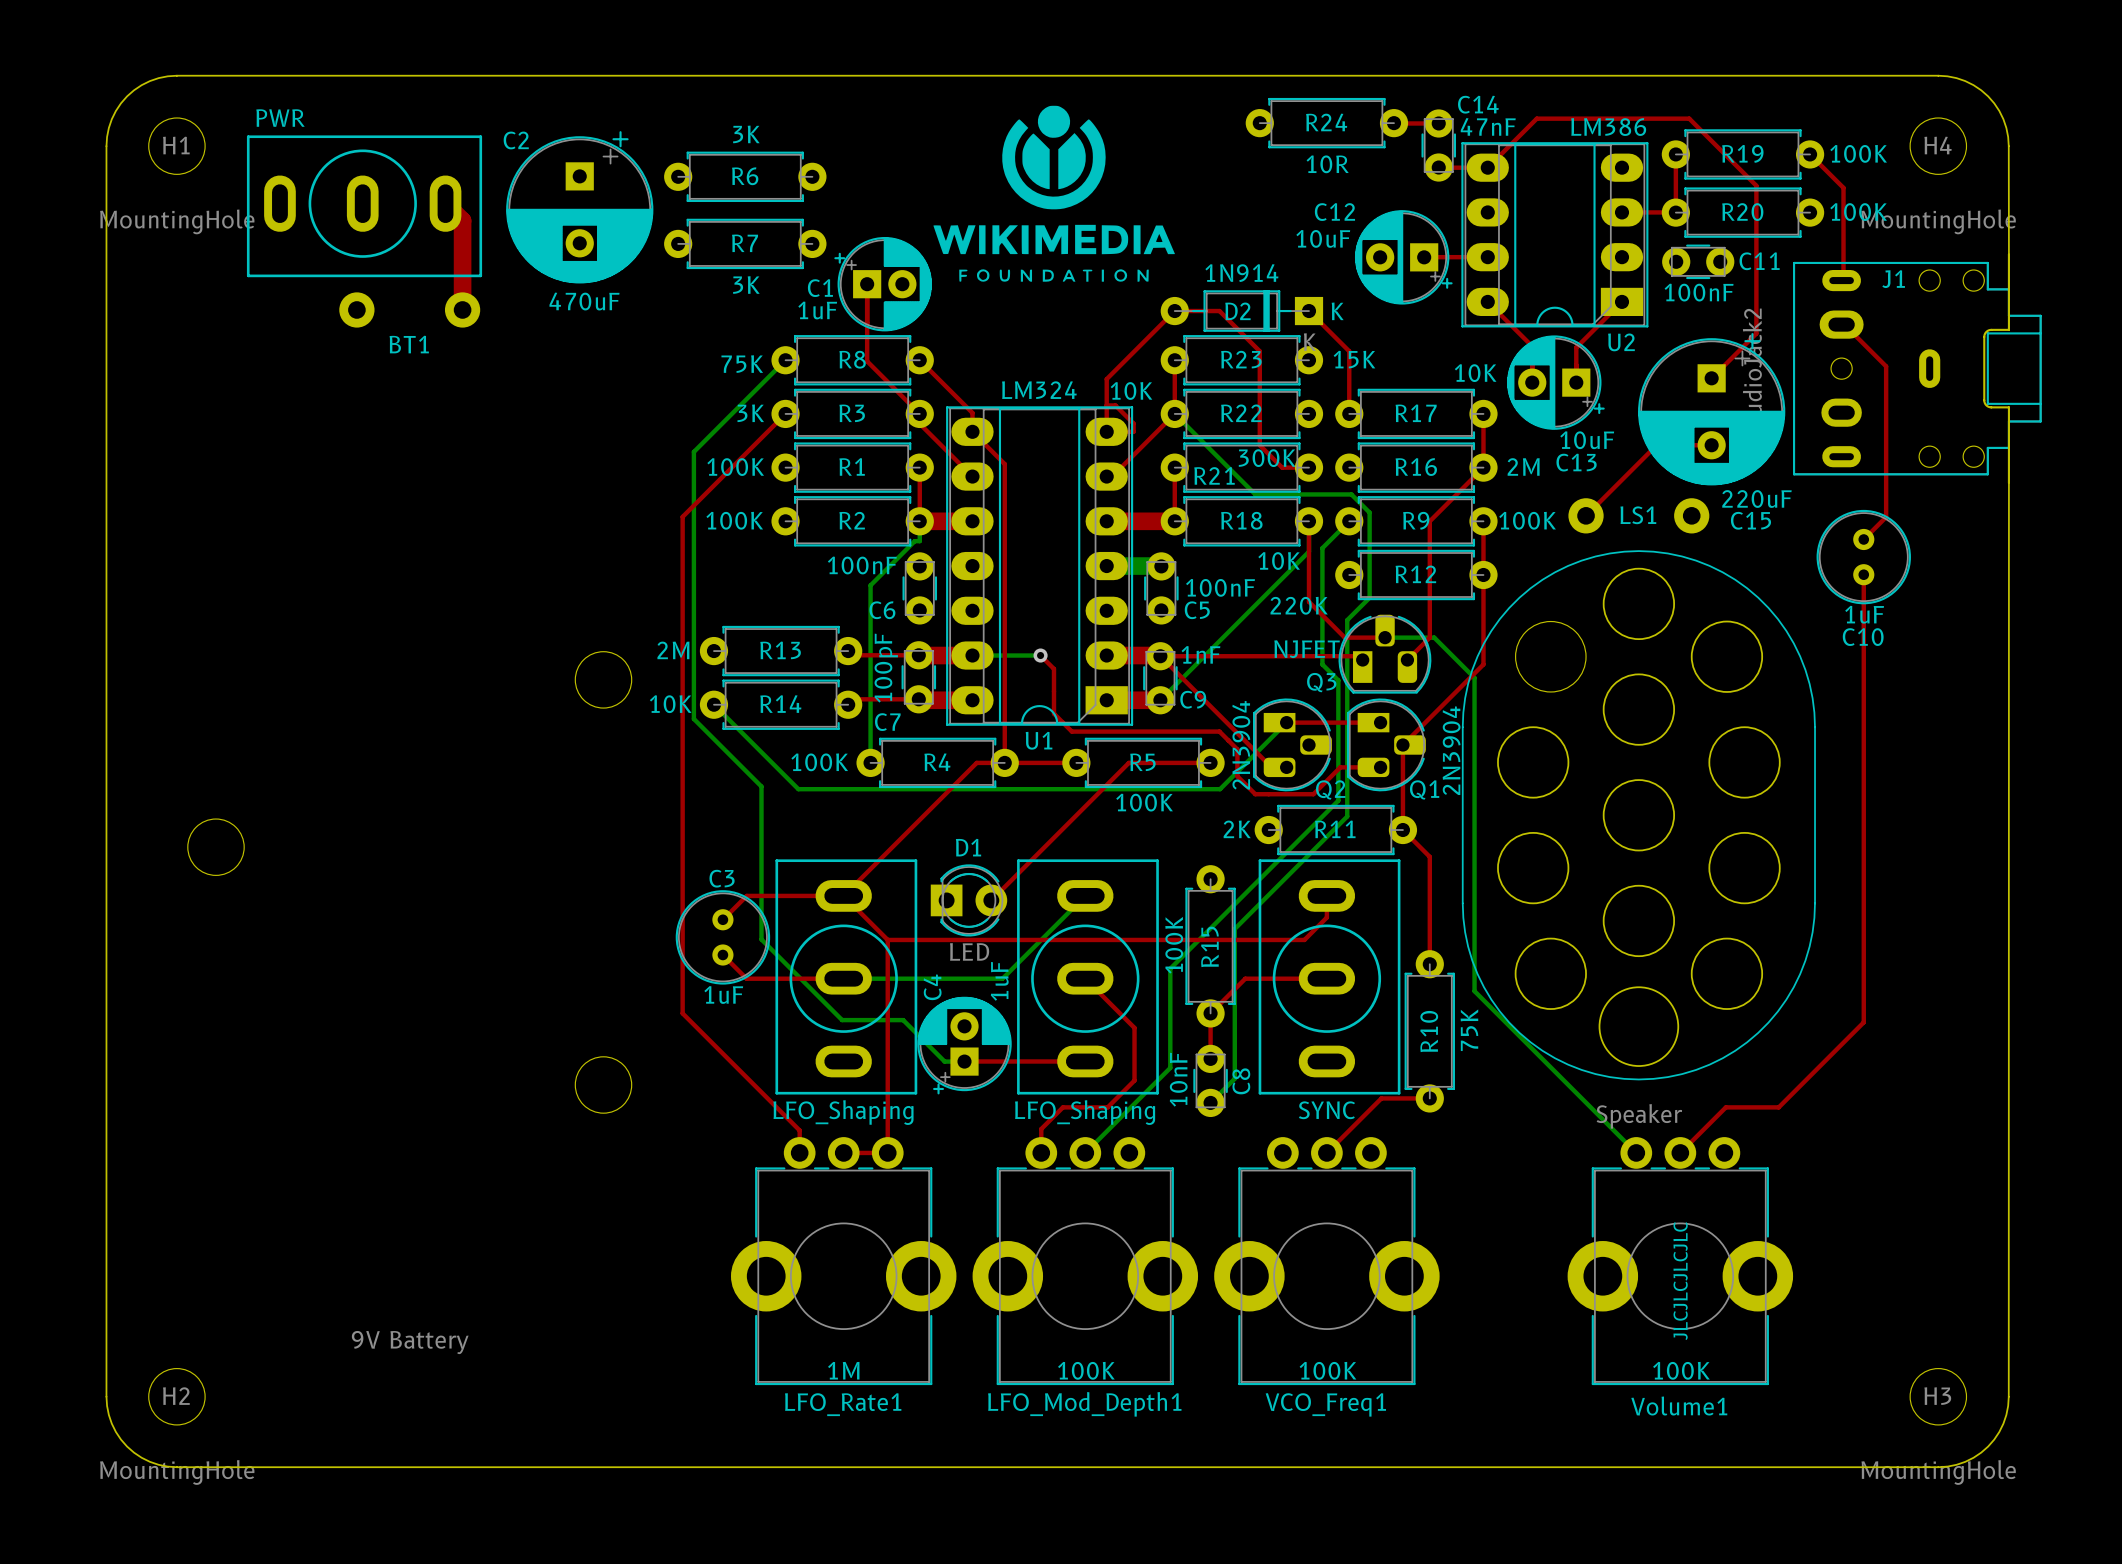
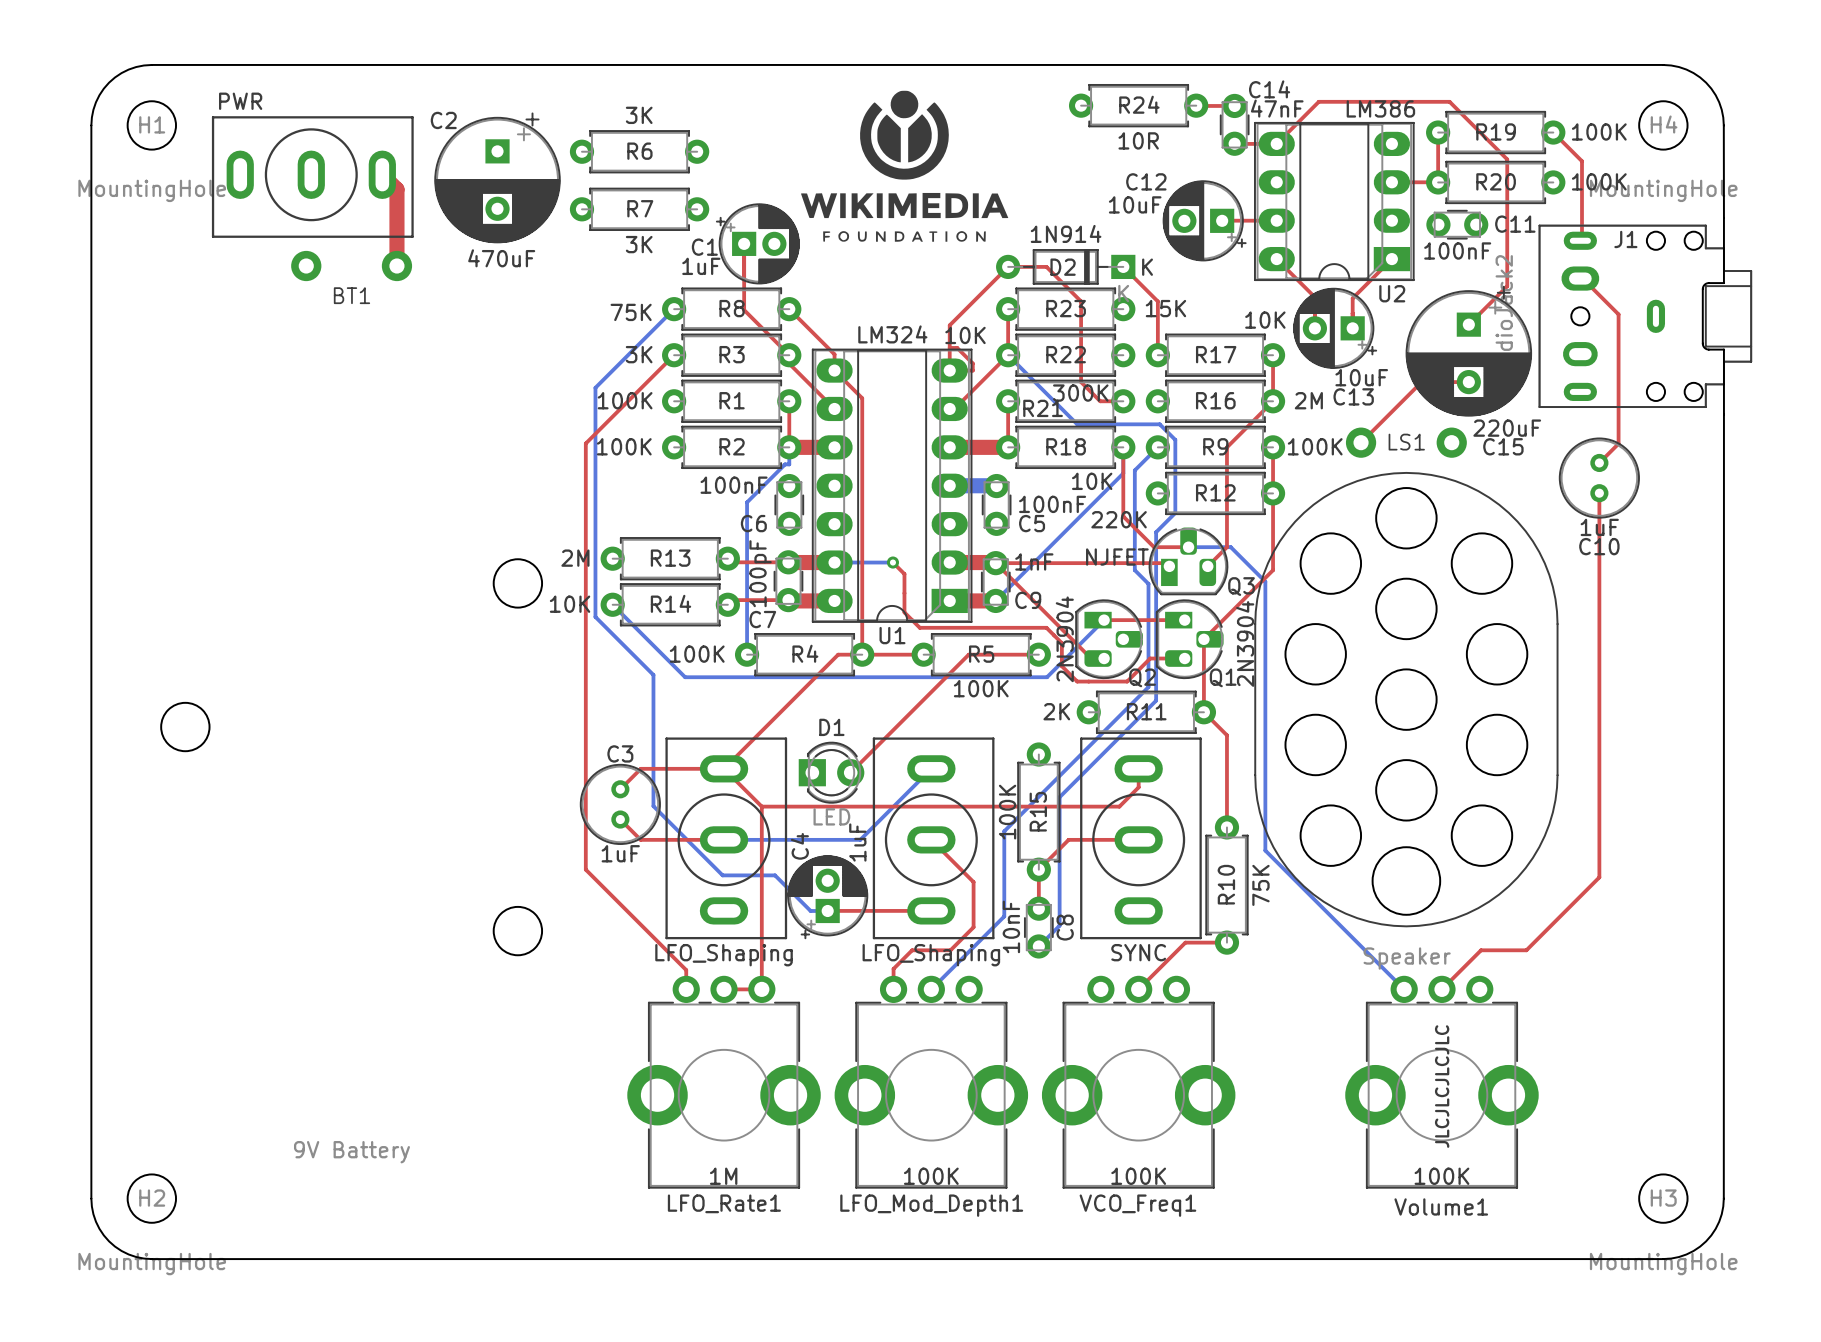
Q3 name position: Q3 (1321, 682) -> Q3 (1241, 586)

